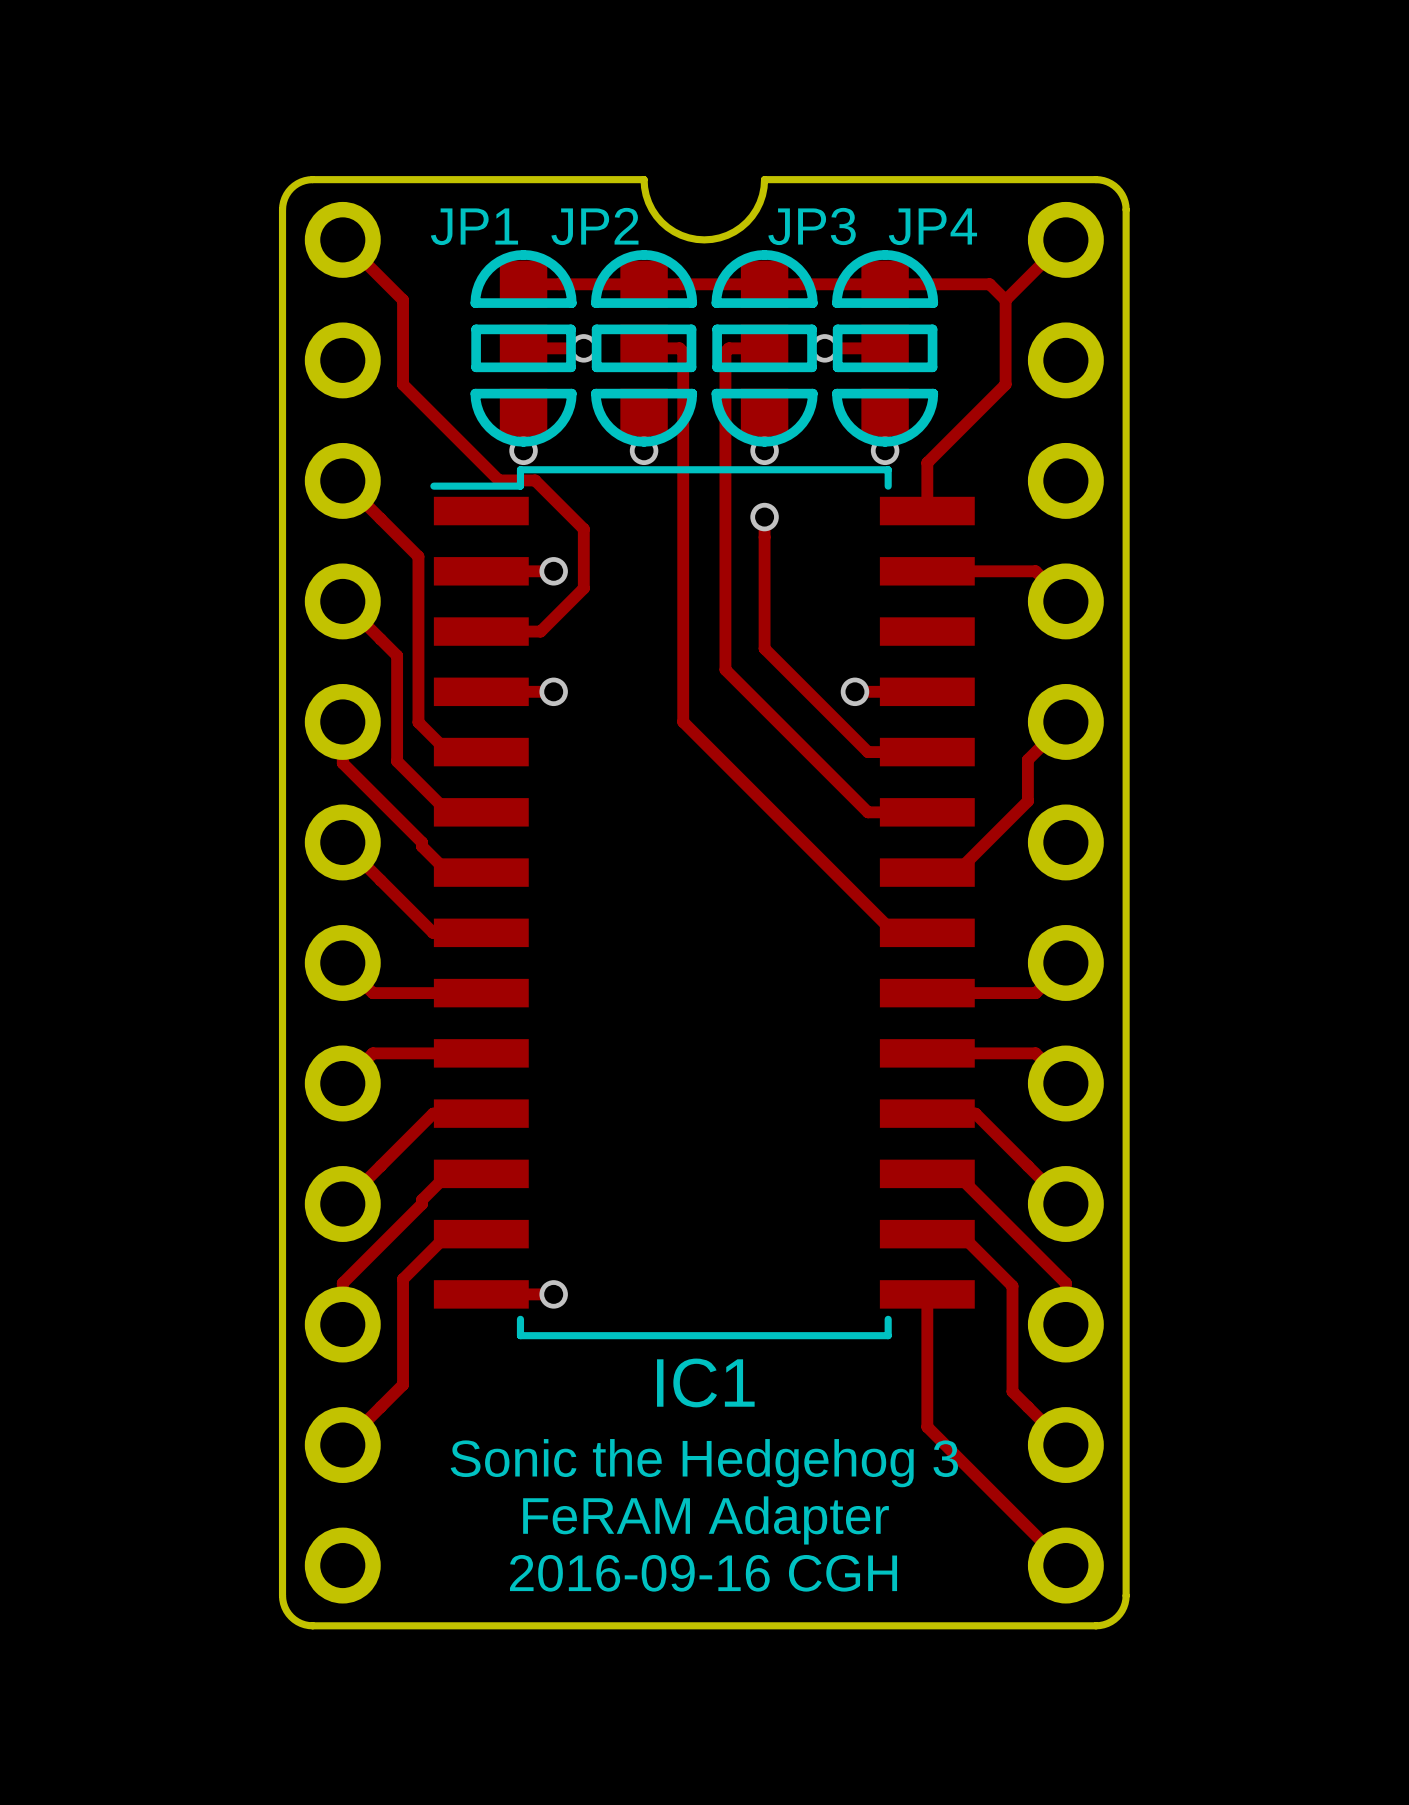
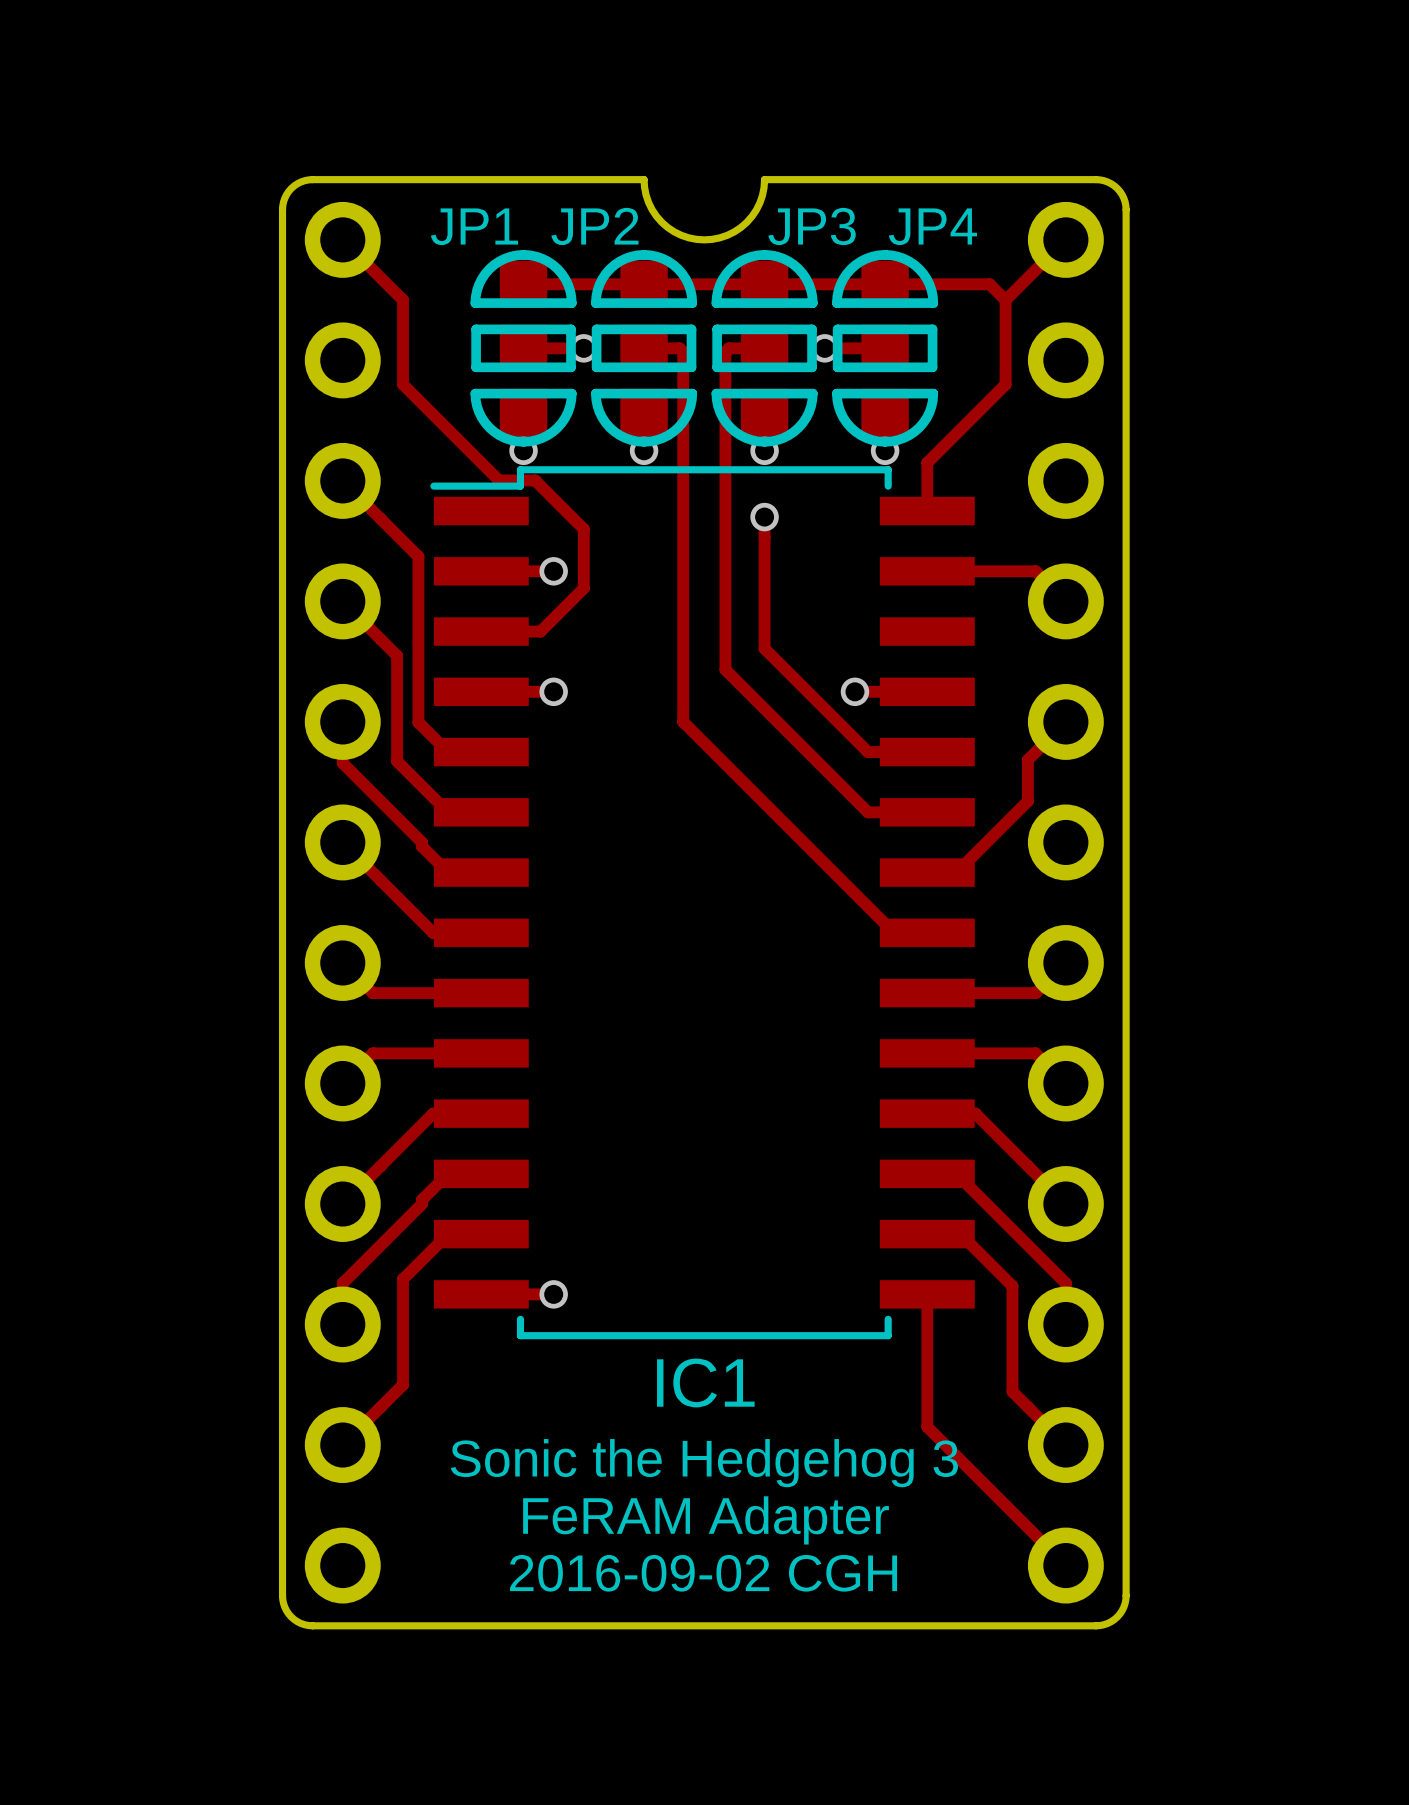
text: 2016-09-16 CGH (703, 1573) -> 2016-09-02 CGH (703, 1573)

